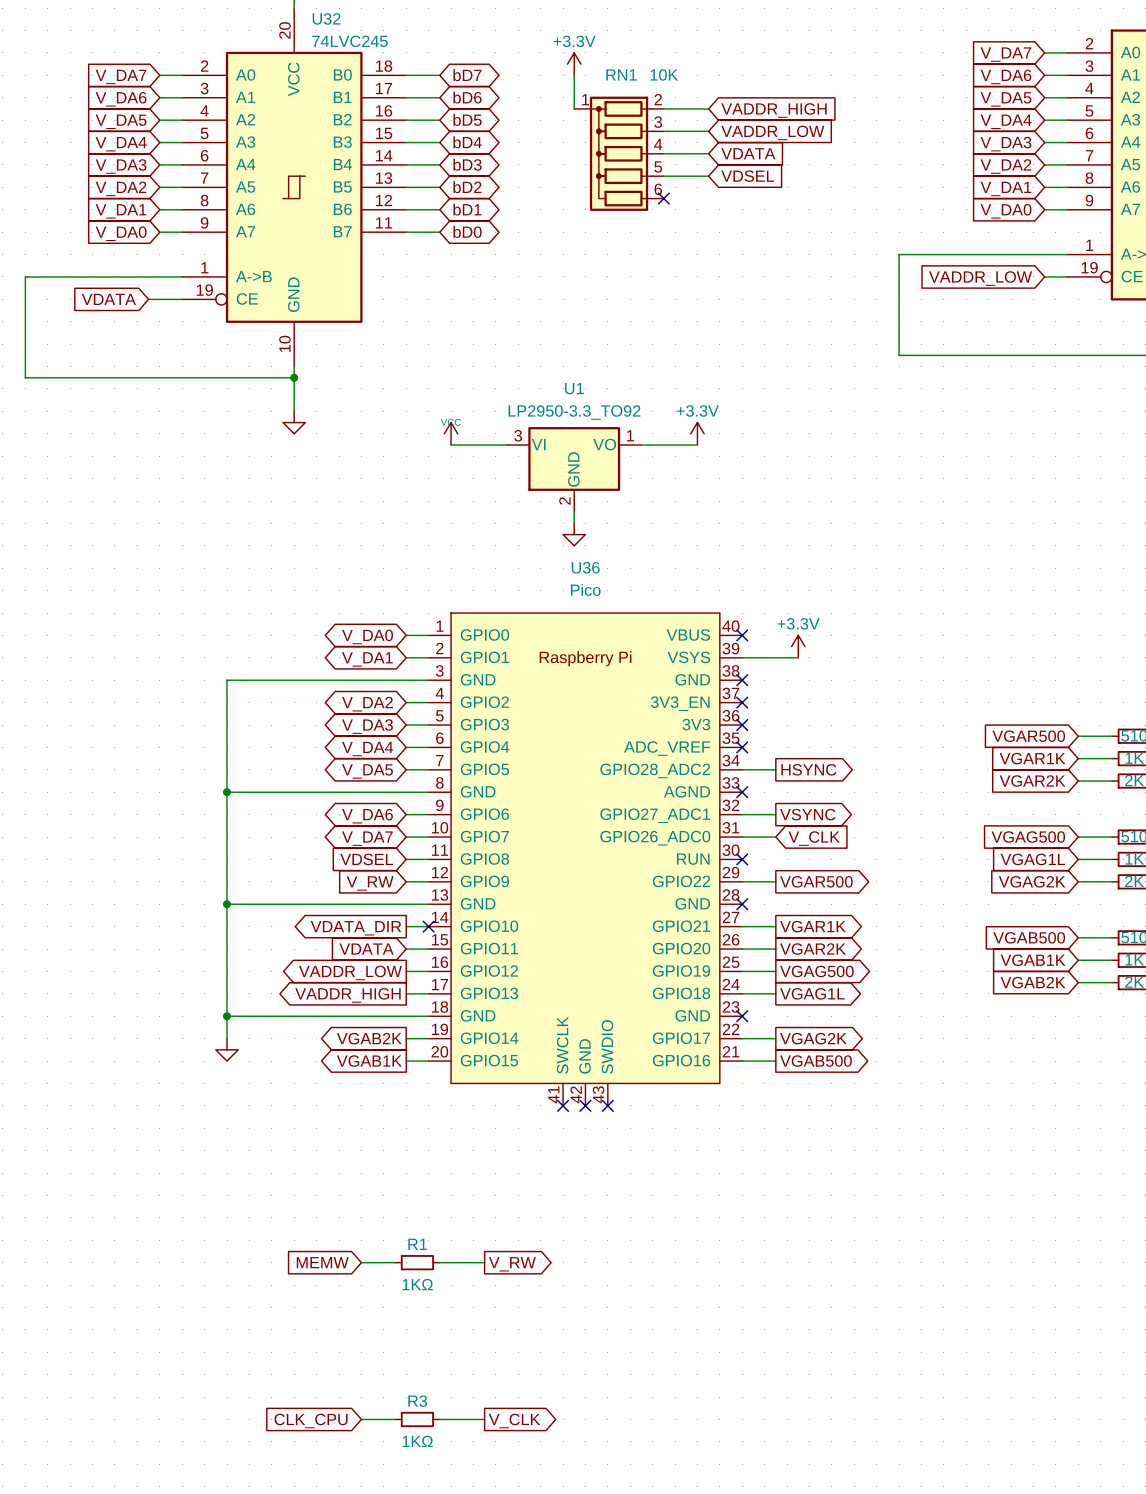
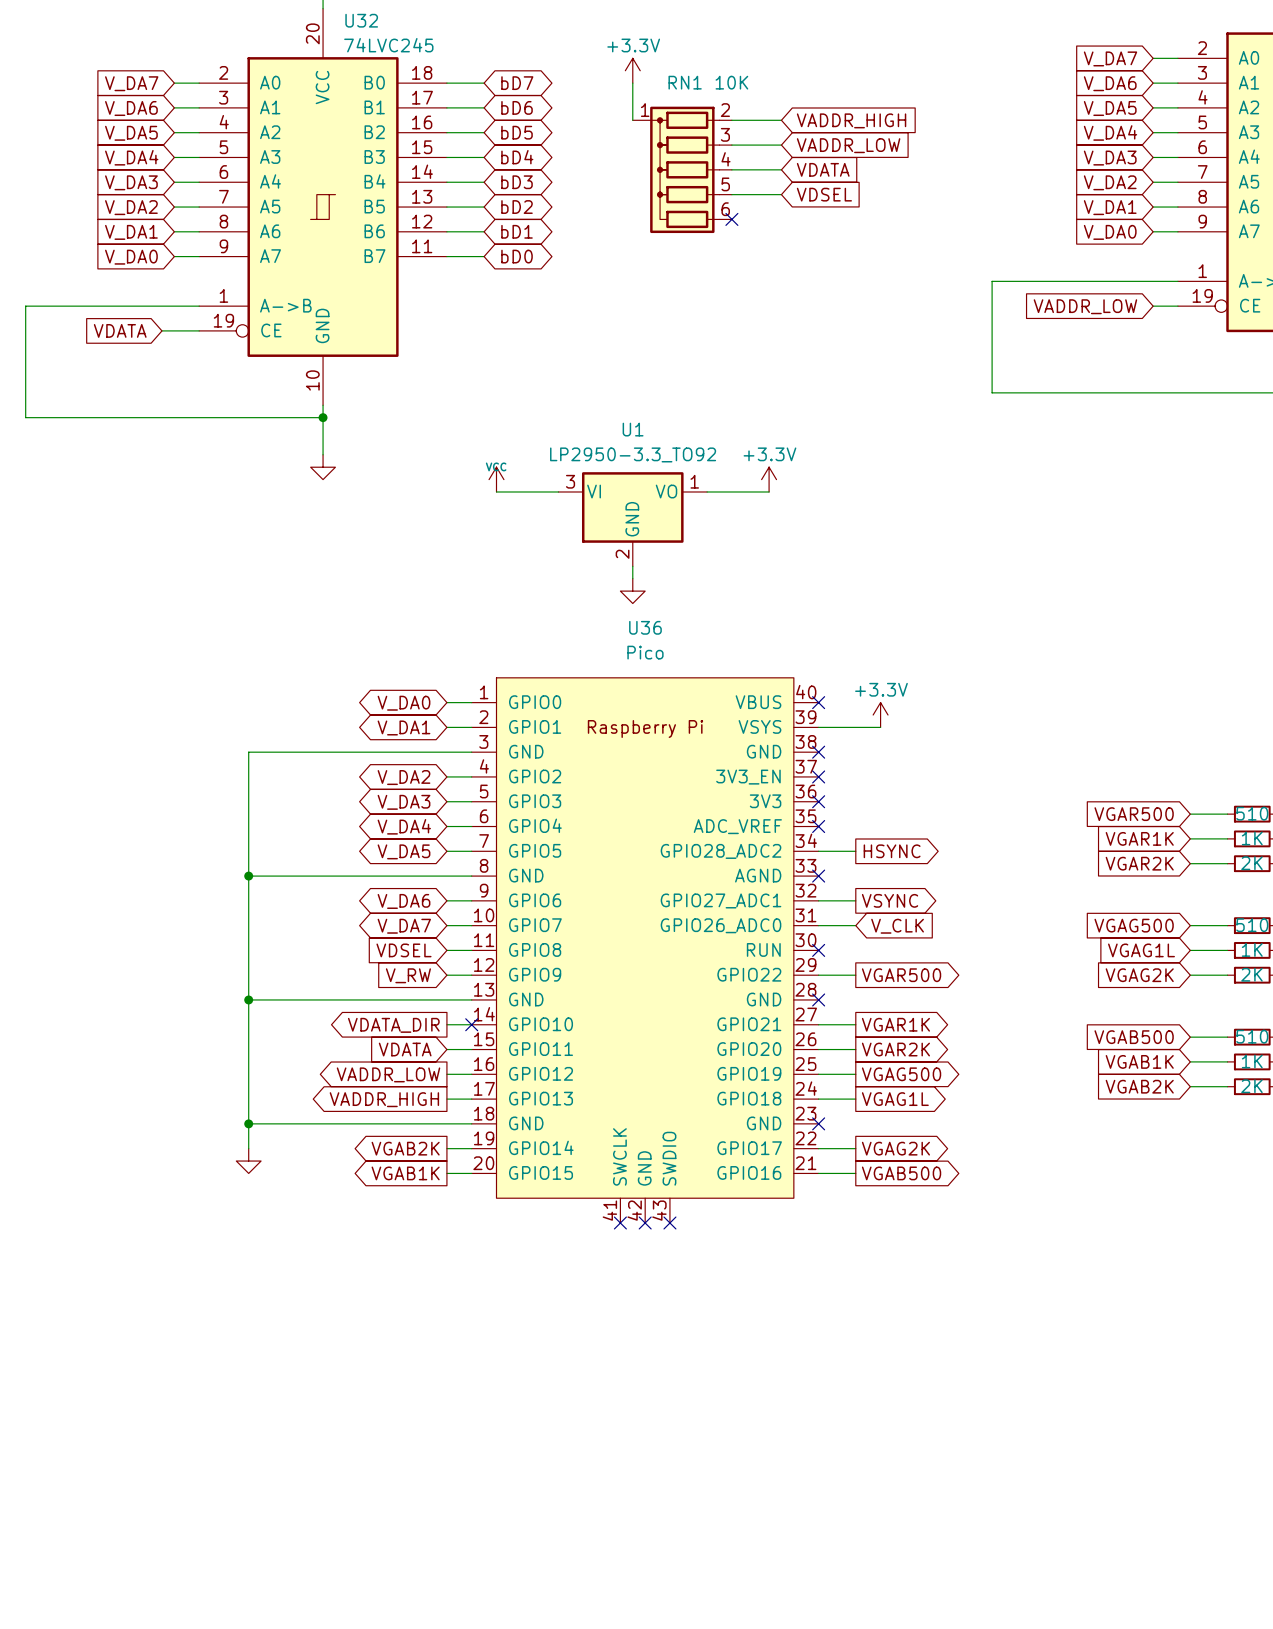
global label: MEMW (322, 1262) -> none
wire: (361, 1262) (395, 1262) -> none
R1: 1KΩ (417, 1262) -> none
wire: (439, 1262) (484, 1262) -> none
global label: V_RW (512, 1264) -> none
wire: (361, 1419) (395, 1419) -> none
R3: 1KΩ (417, 1419) -> none
wire: (439, 1419) (484, 1419) -> none
global label: CLK_CPU (311, 1421) -> none
global label: V_CLK (514, 1421) -> none

